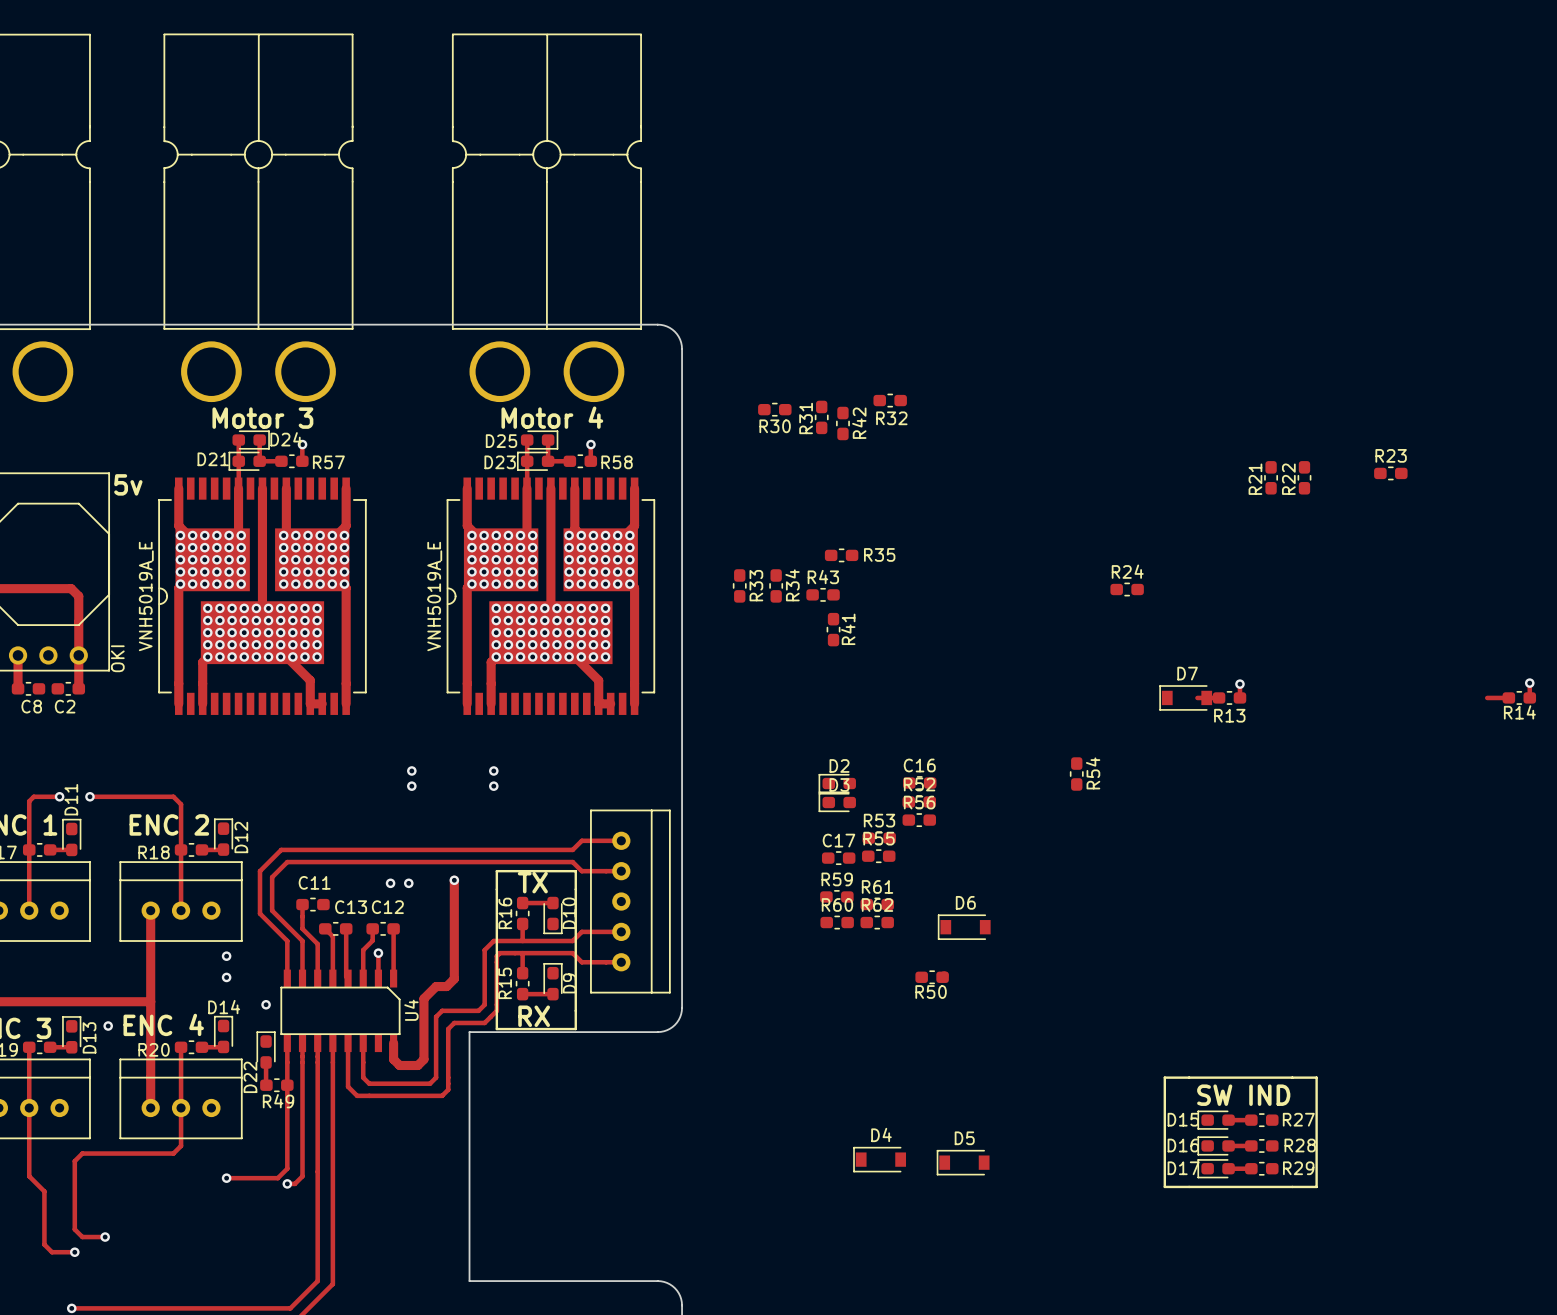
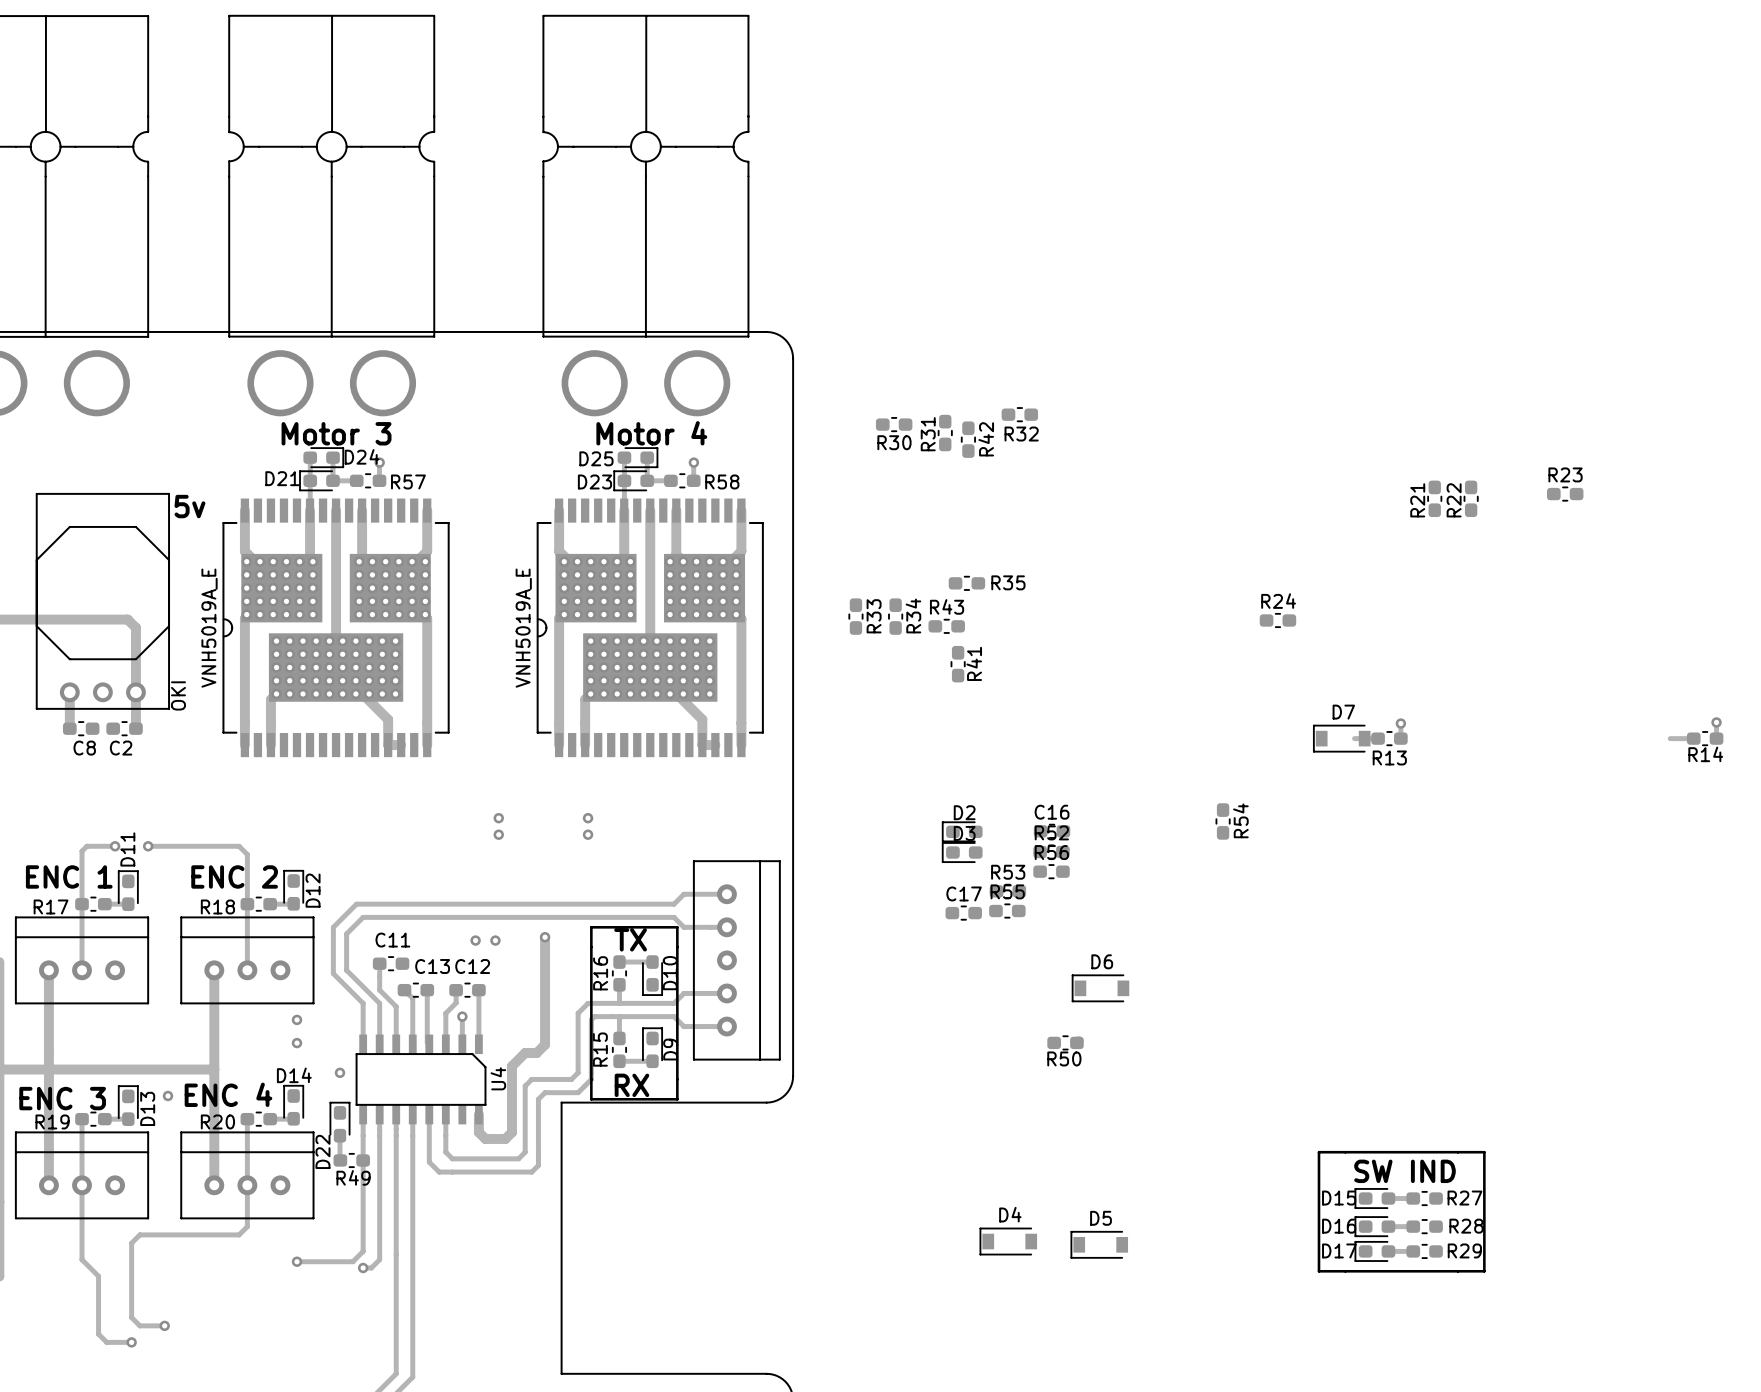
R59: (836, 896) -> none
R61: (877, 904) -> none
R60: (837, 922) -> none
R62: (877, 922) -> none

